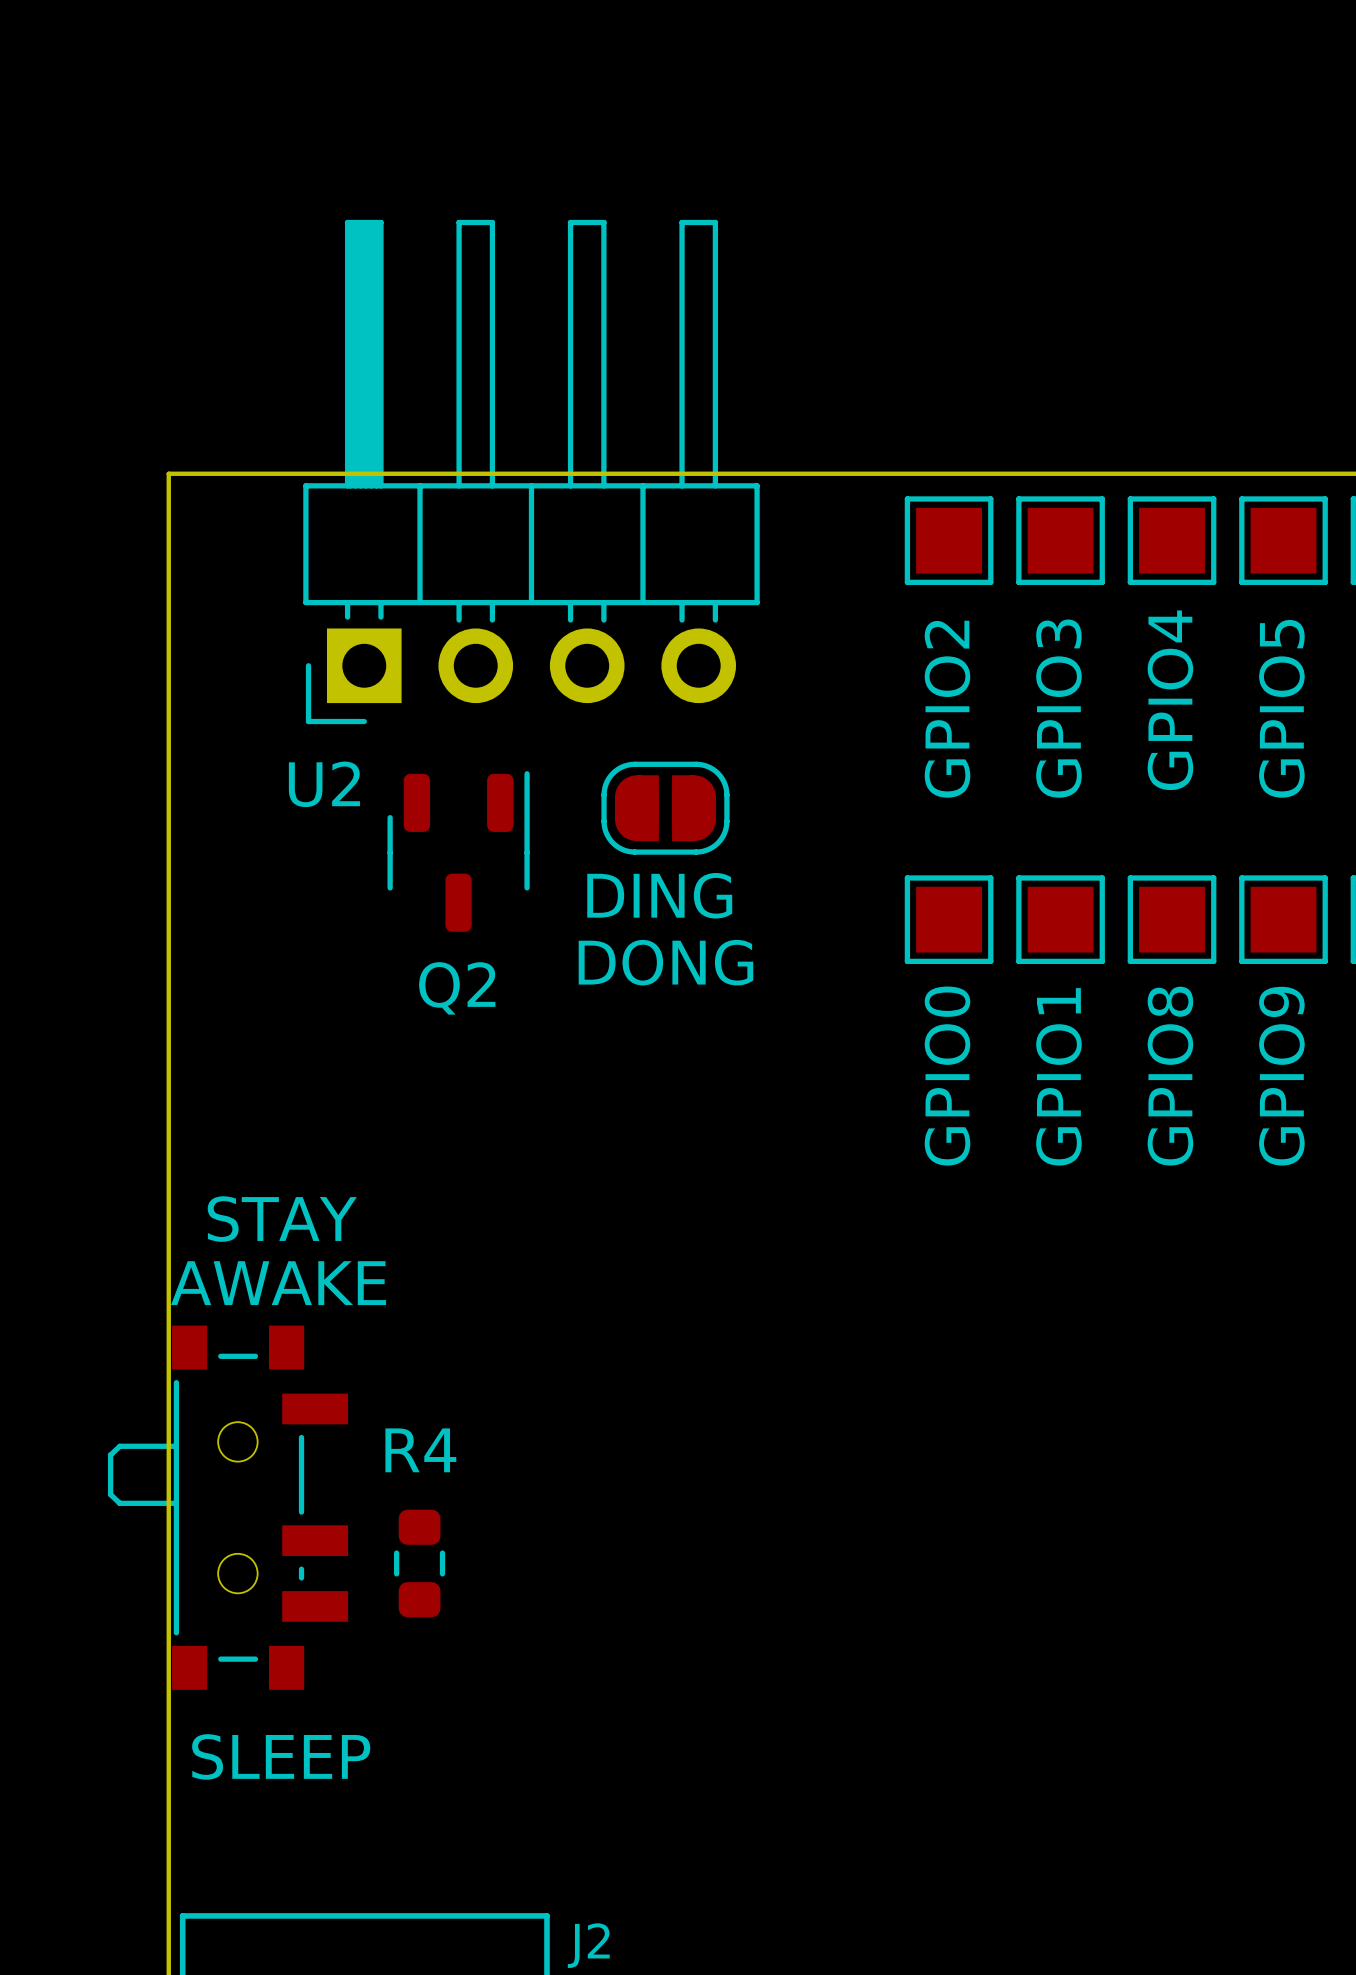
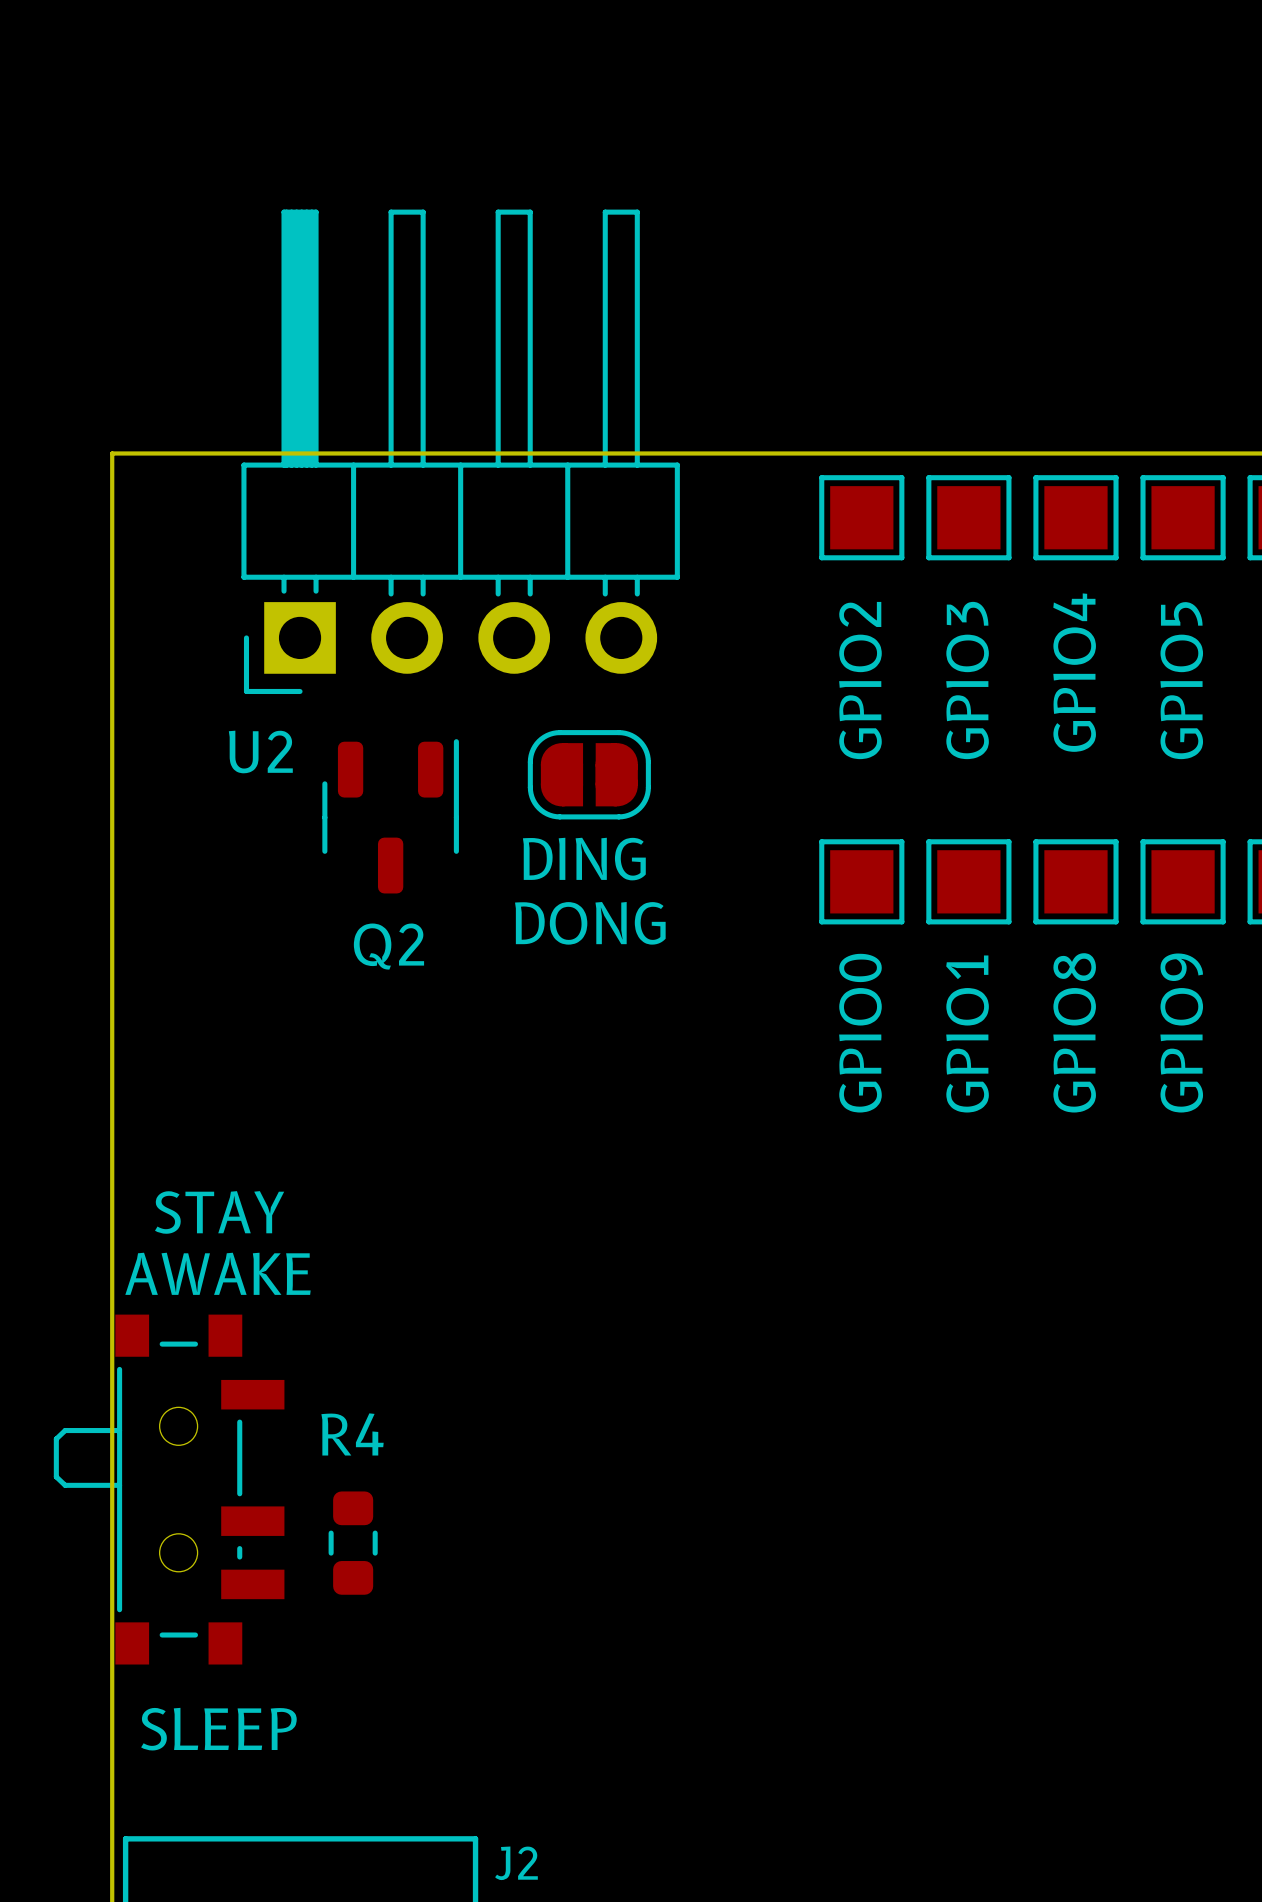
part position: (228, 1507) -> (169, 1489)
R4 position: (419, 1563) -> (353, 1543)

